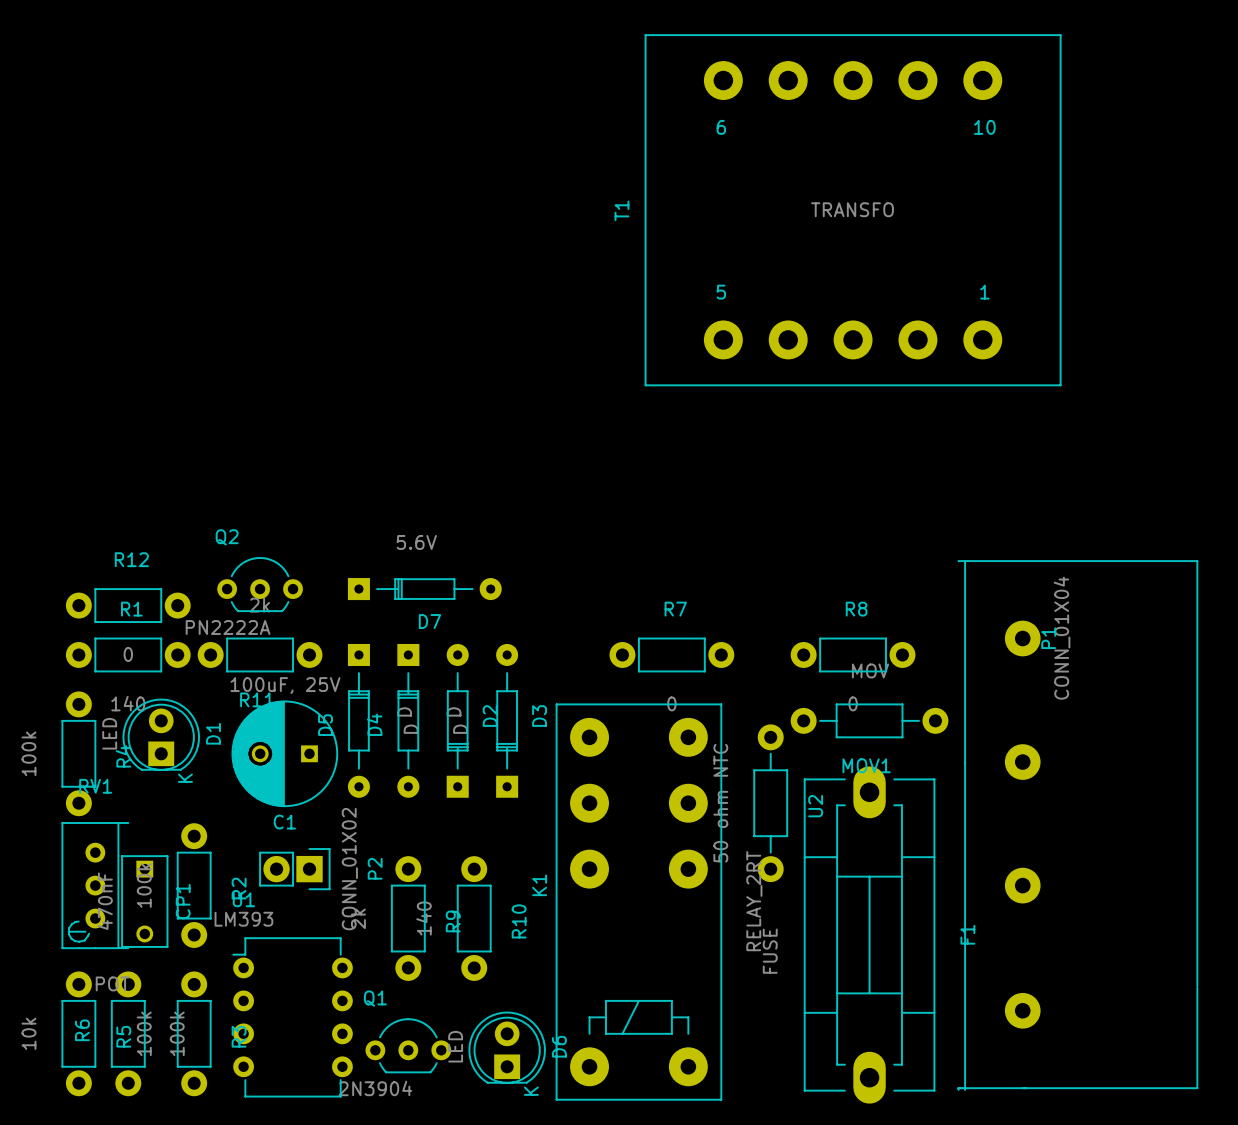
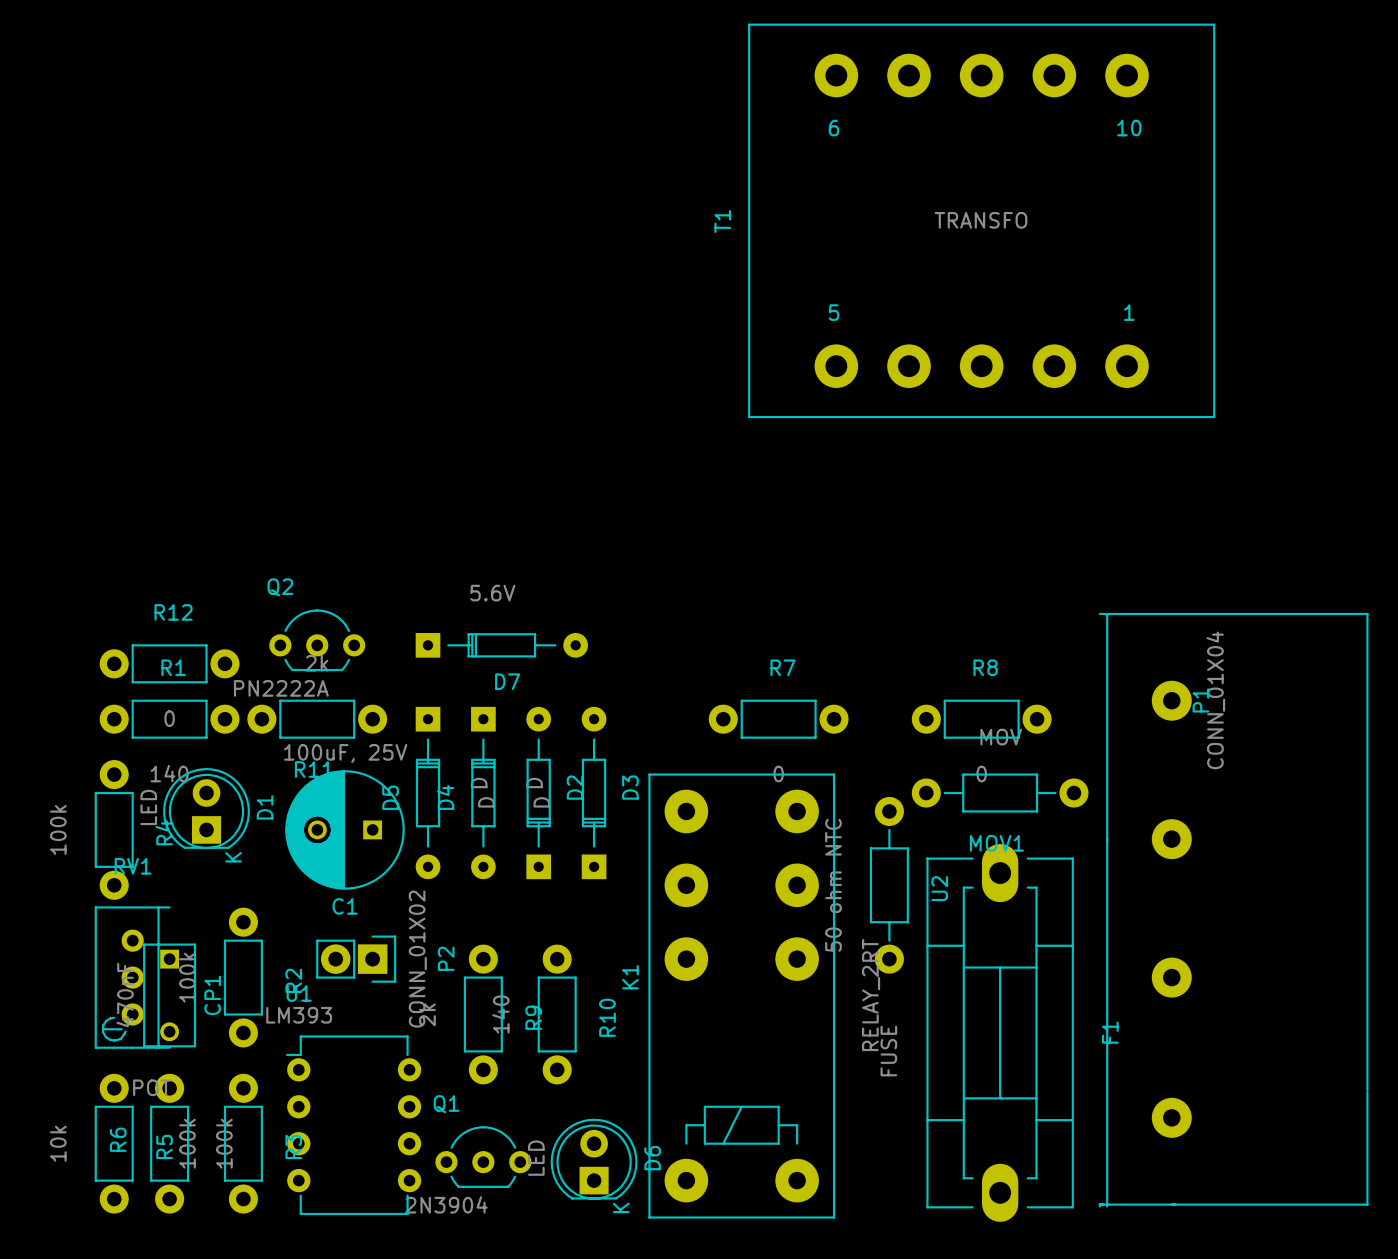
CP1 position: (144, 901) -> (169, 995)

